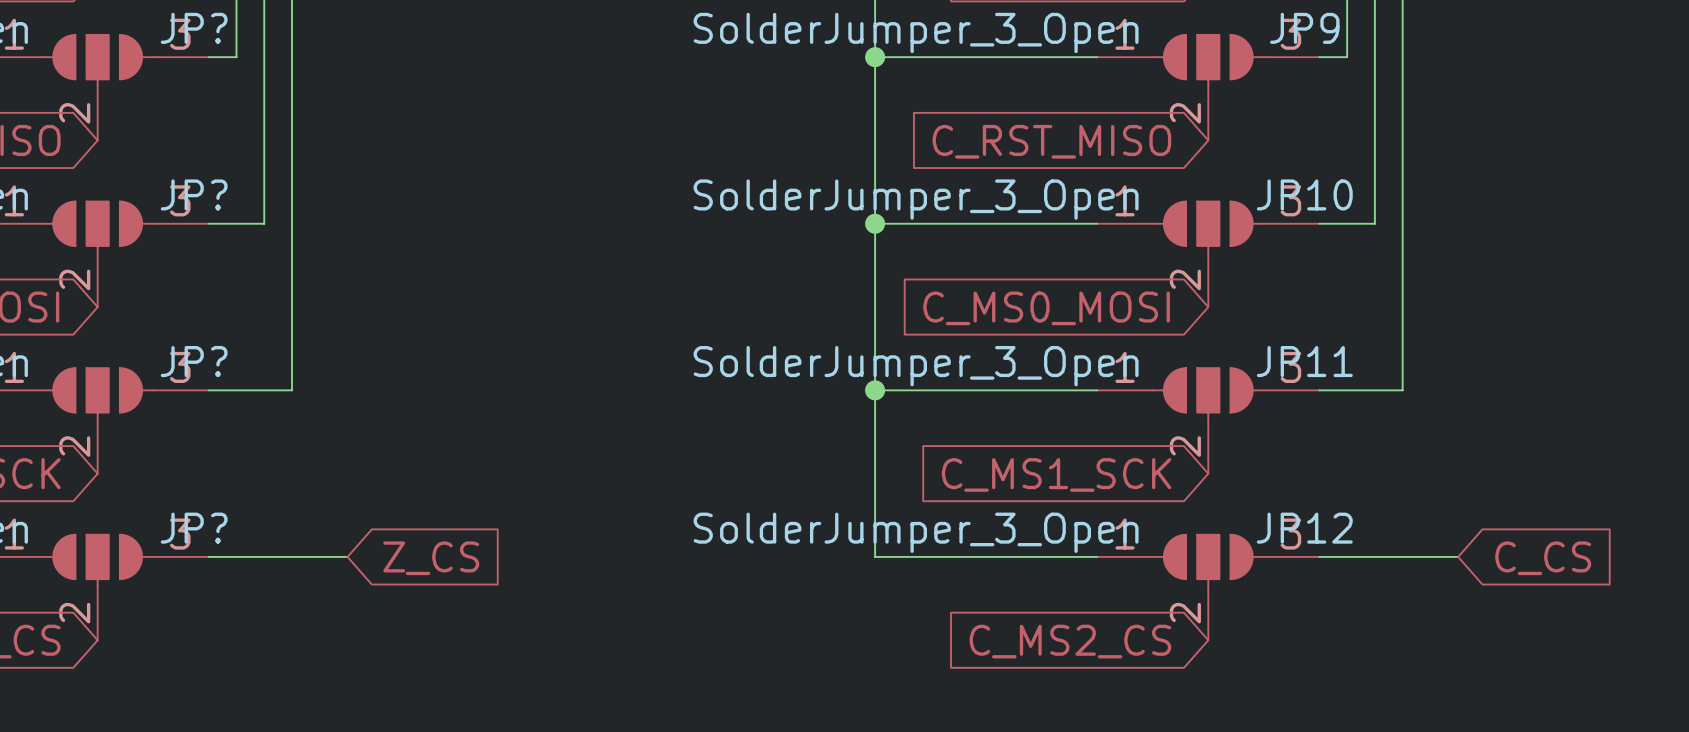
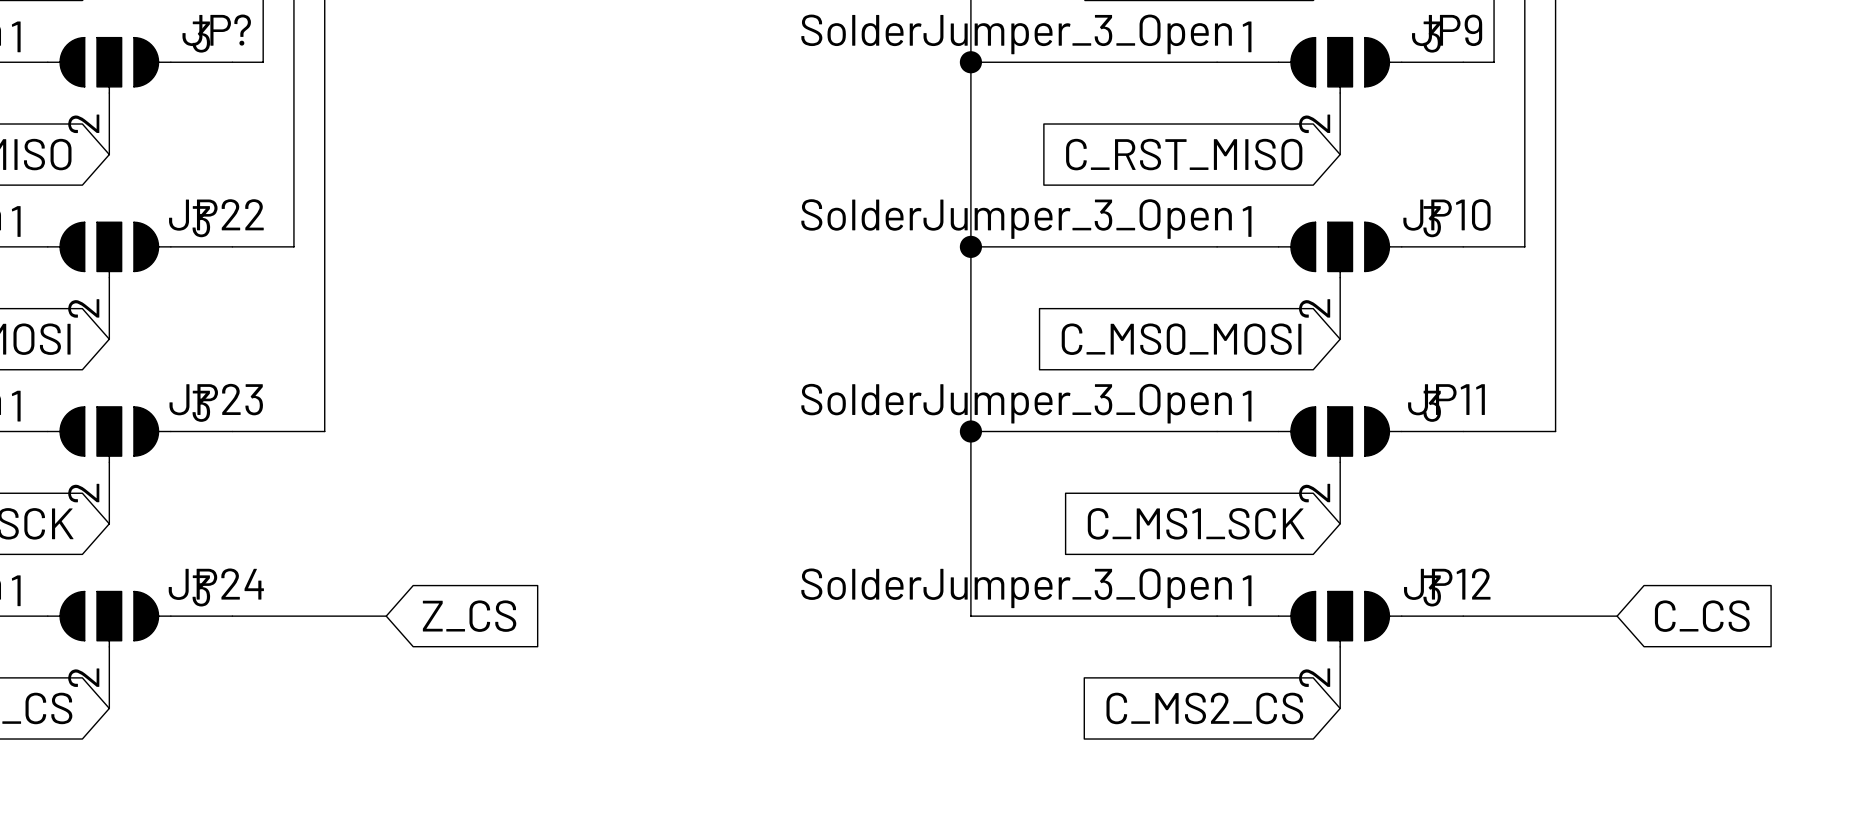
JP? name: JP? (194, 194) -> JP22 (216, 214)
JP? name: JP? (194, 361) -> JP23 (216, 399)
JP? name: JP? (194, 528) -> JP24 (216, 584)

